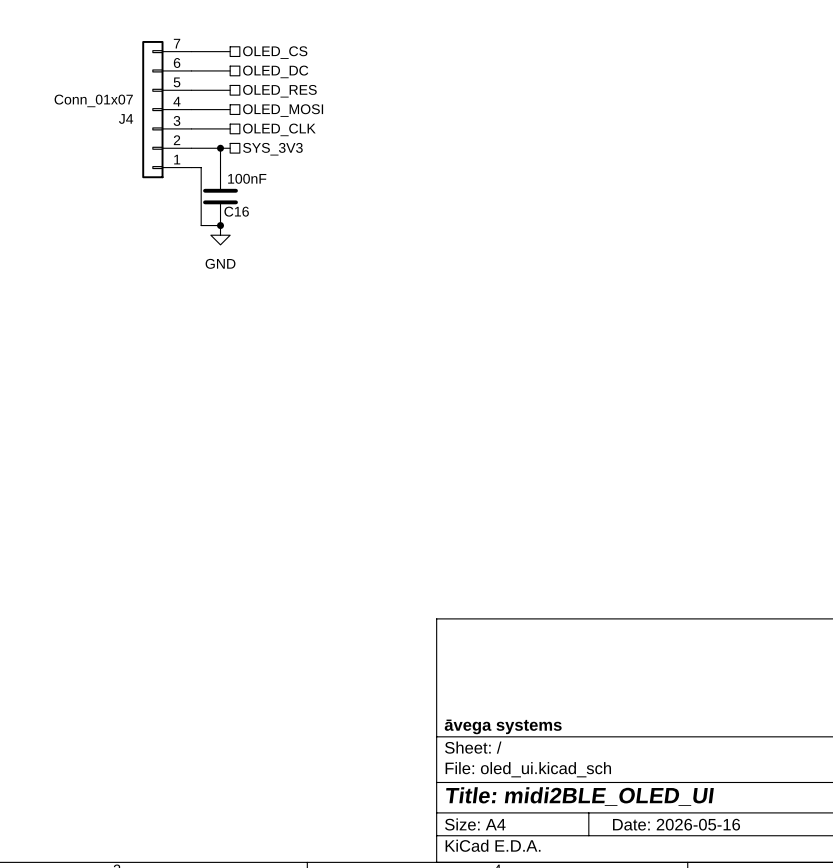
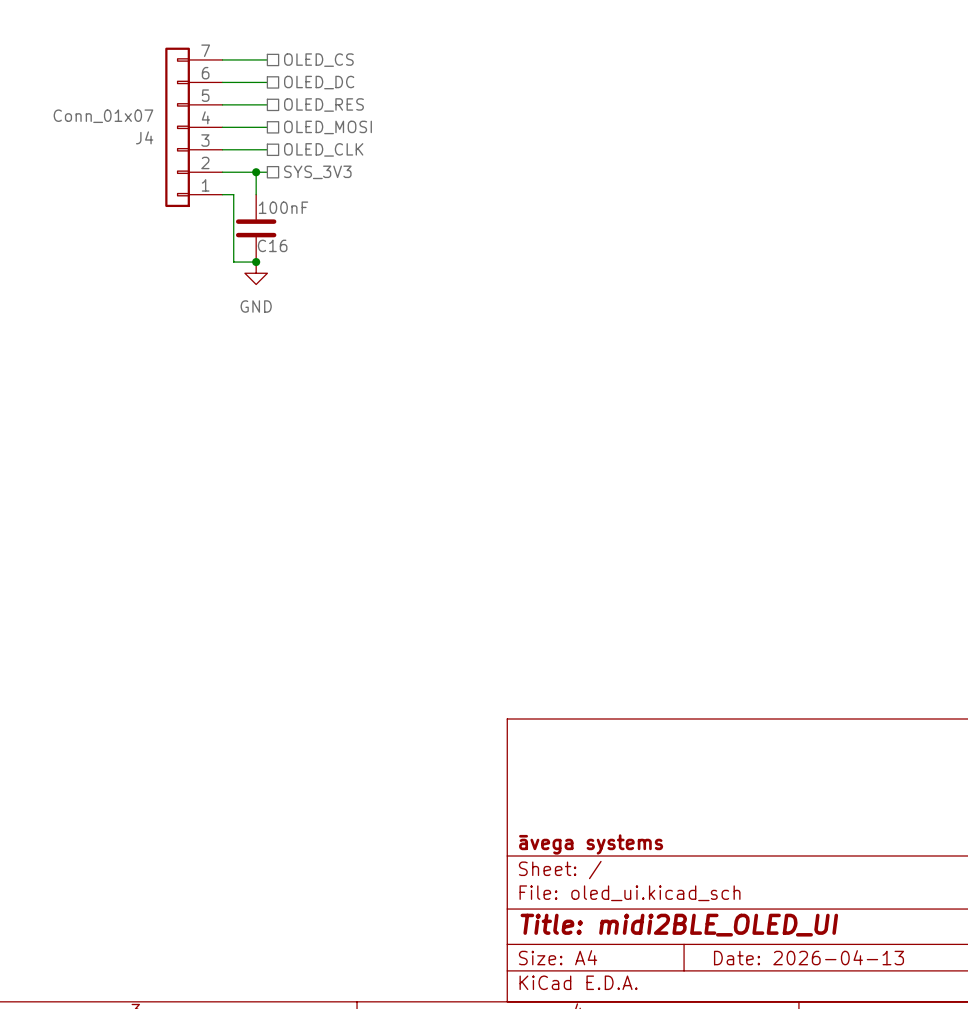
title block: Date: 2026-05-16 (676, 824) -> Date: 2026-04-13 (808, 957)

